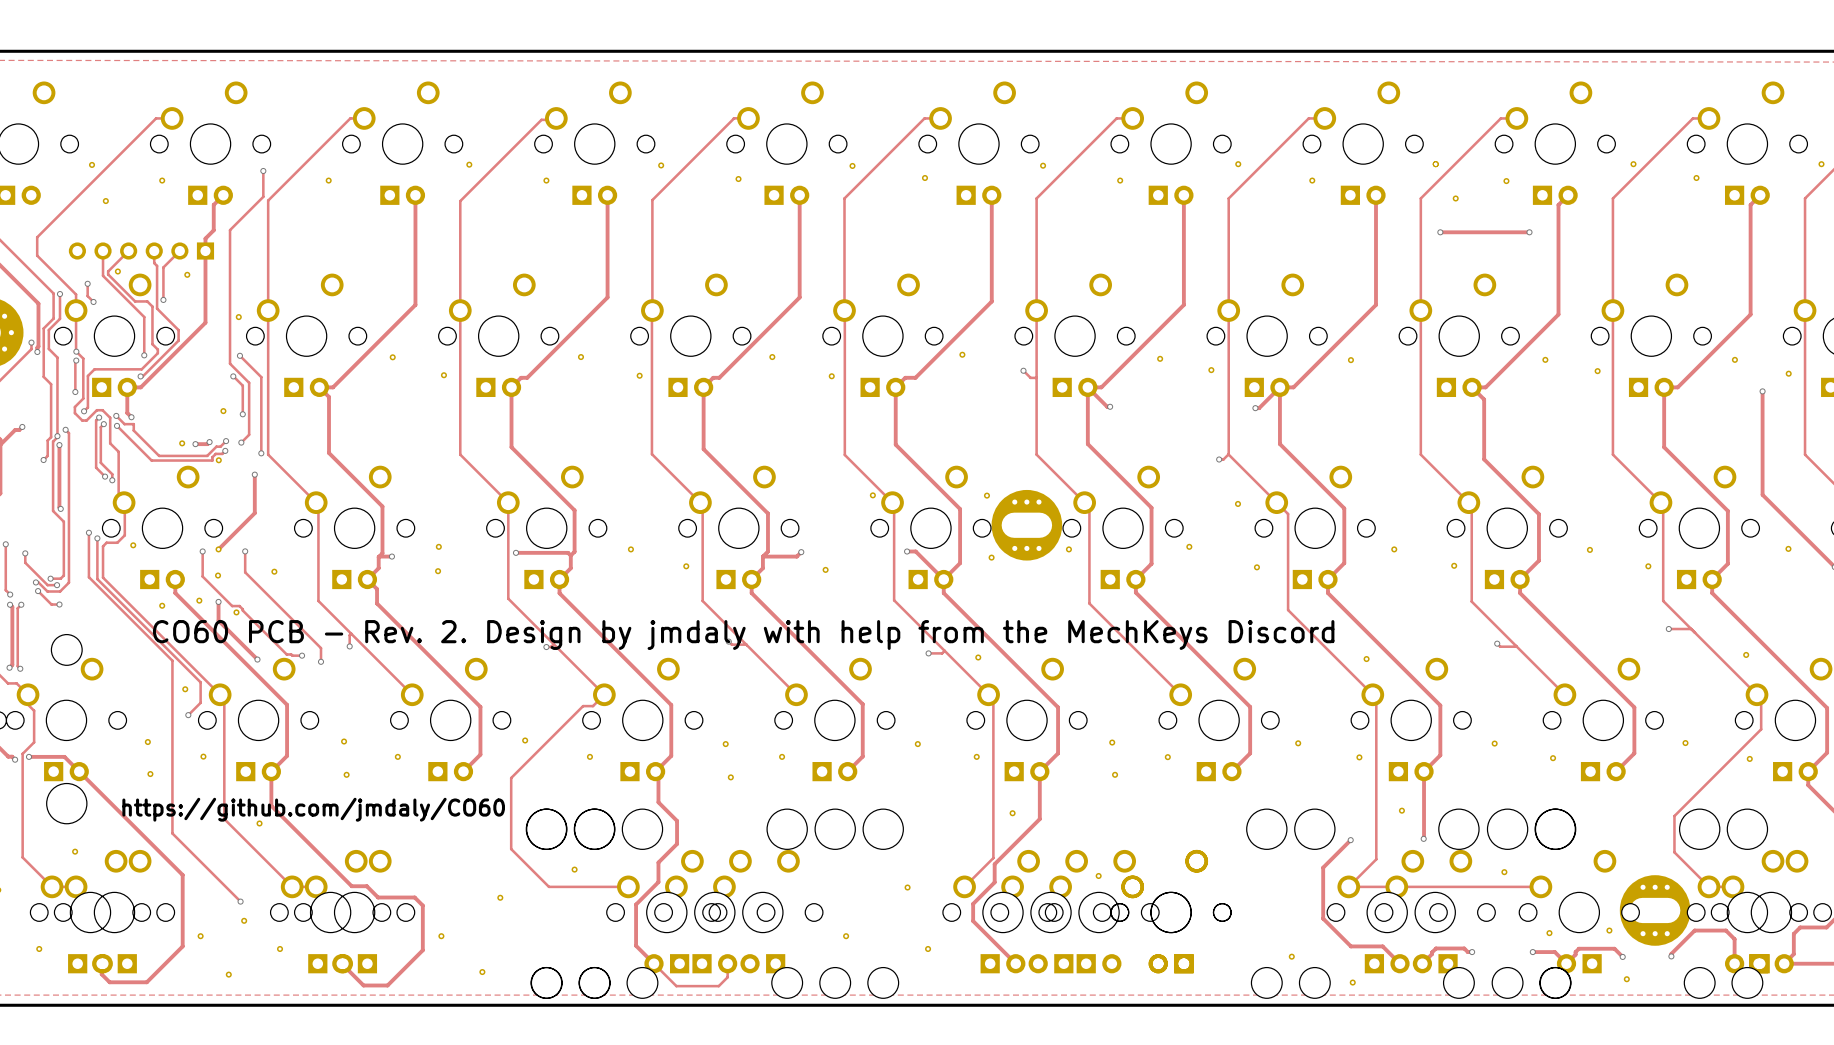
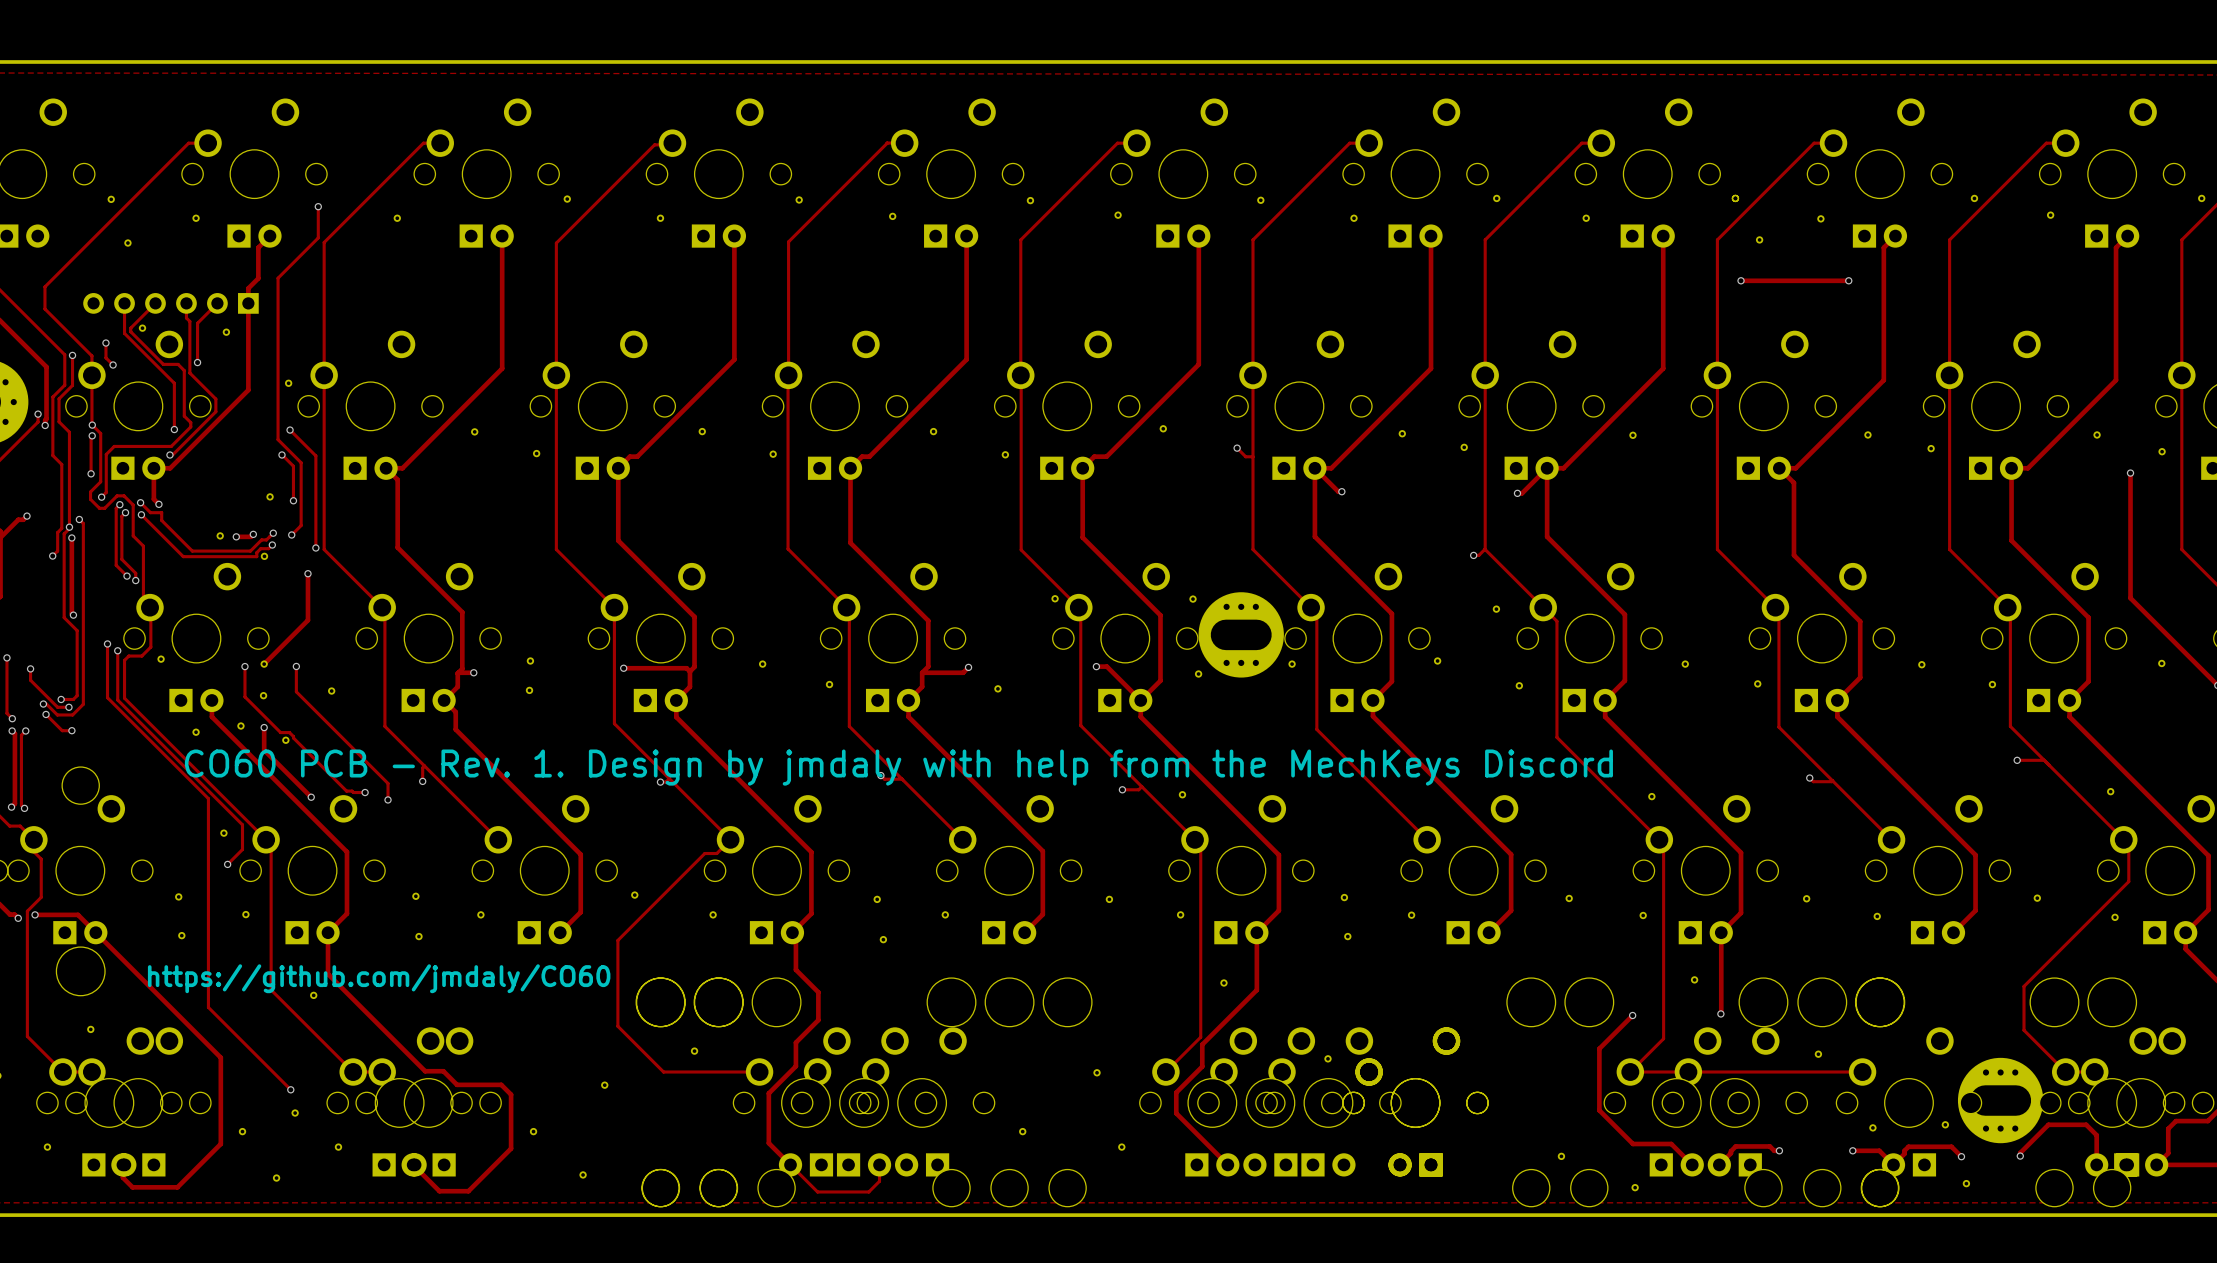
text: CO60 PCB - Rev. 2. Design by jmdaly with help from the MechKeys Discord (743, 635) -> CO60 PCB - Rev. 1. Design by jmdaly with help from the MechKeys Discord (898, 767)

